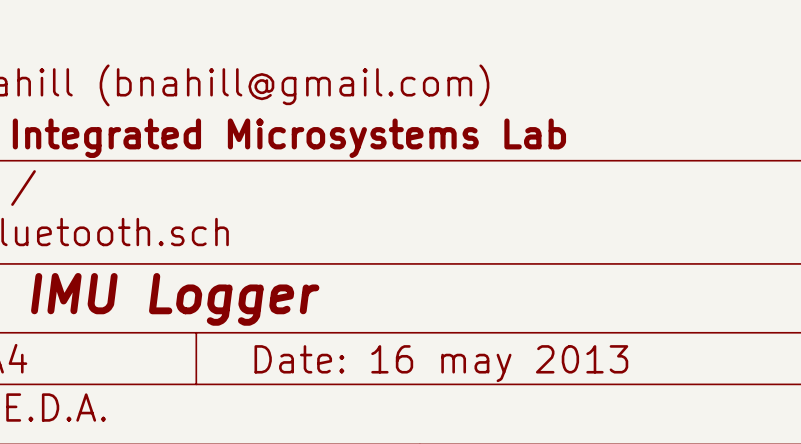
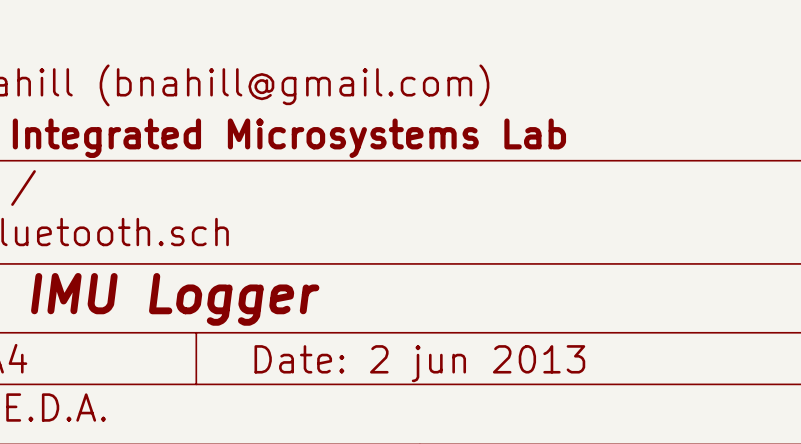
title block: Date: 16 may 2013 (441, 363) -> Date: 2 jun 2013 (419, 363)

